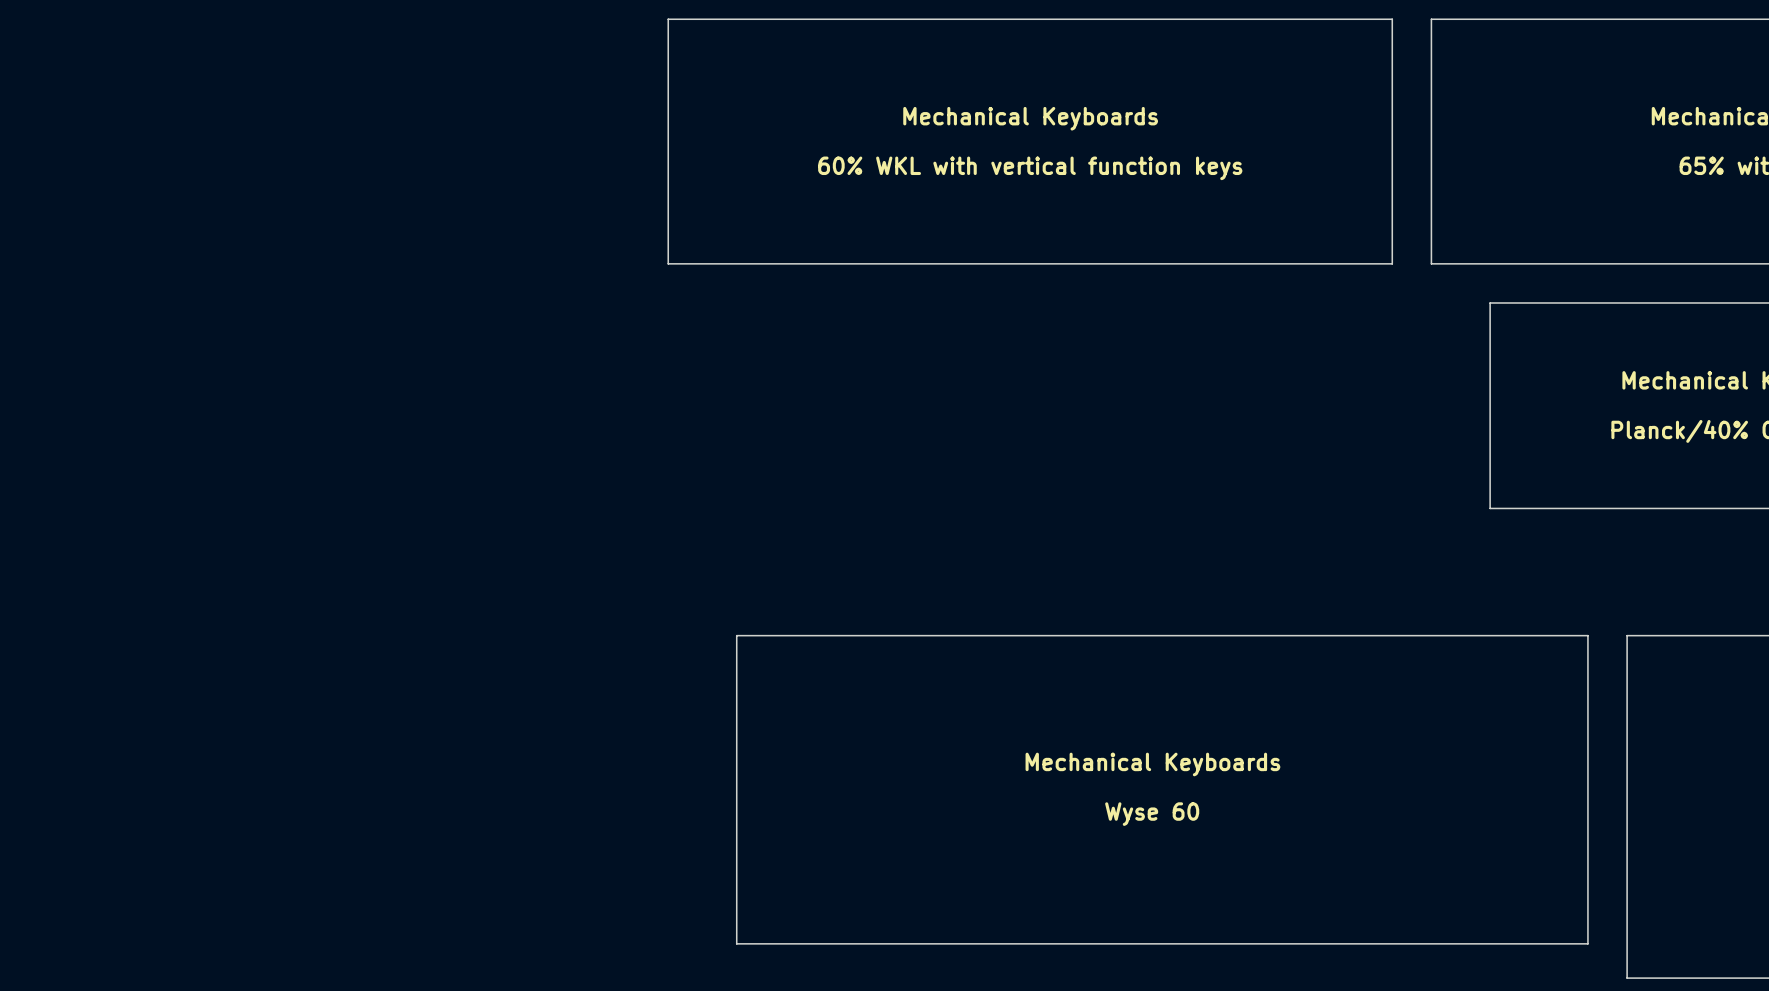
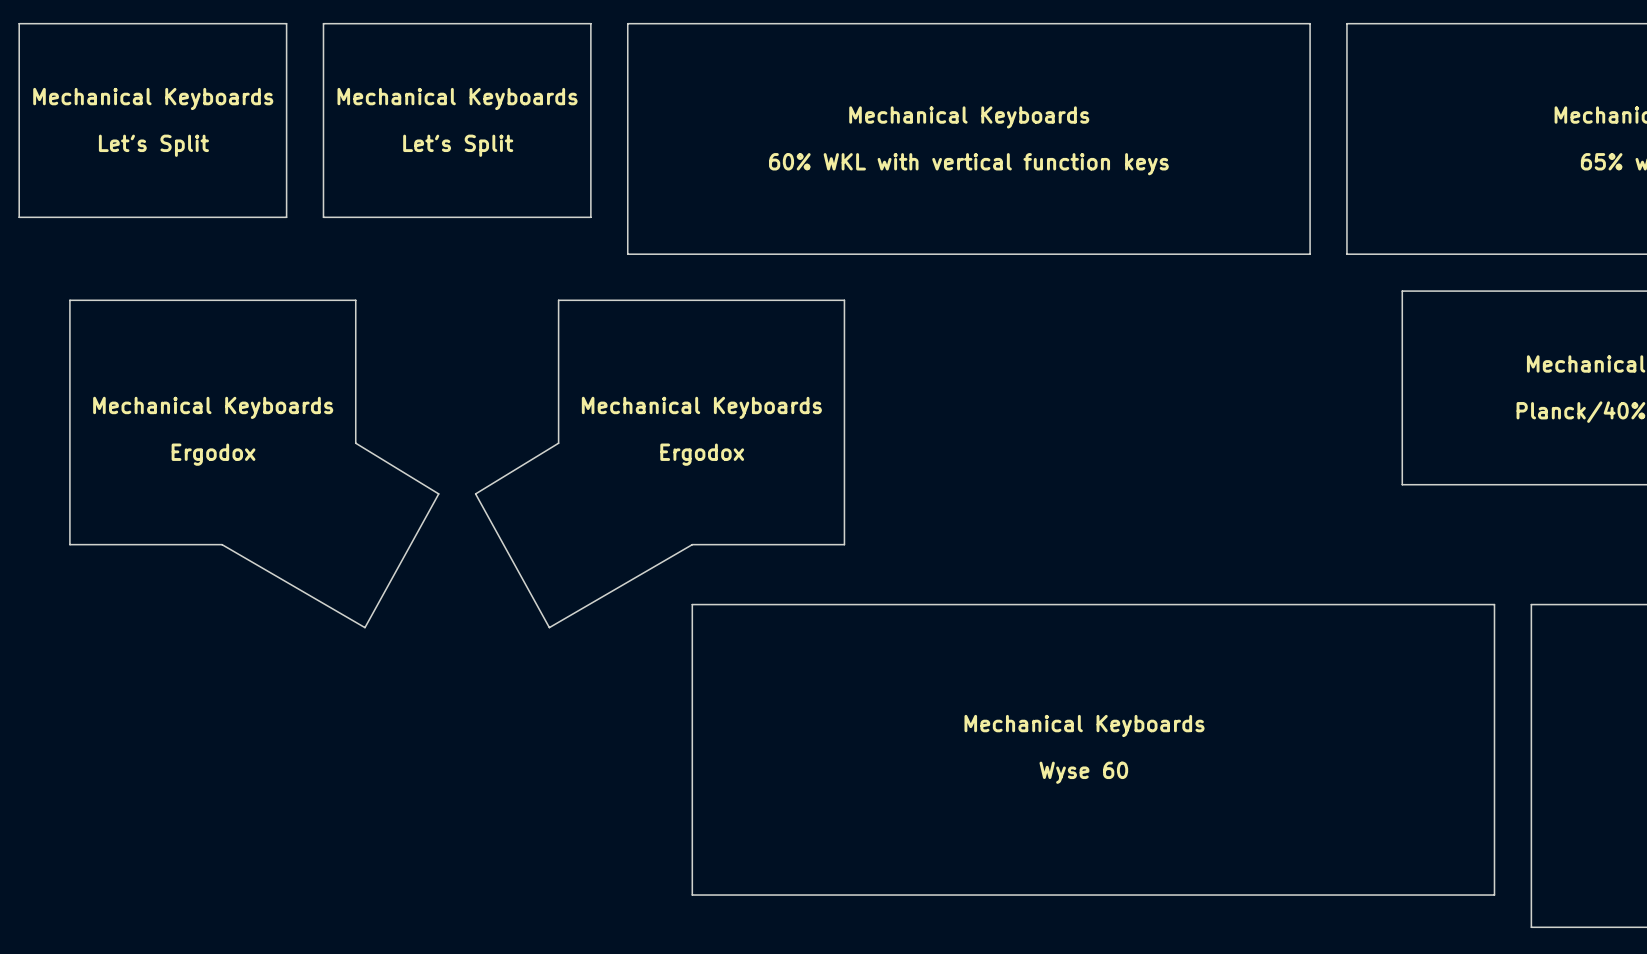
board edge: none -> (286, 23) (286, 217) (19, 217) (19, 23) (286, 23)
board edge: none -> (590, 23) (323, 23) (323, 217) (590, 217) (590, 23)
text: none -> Mechanical Keyboards (153, 99)
text: none -> Mechanical Keyboards (457, 99)
text: none -> Let's Split (153, 145)
text: none -> Let's Split (458, 145)
board edge: none -> (355, 300) (69, 300) (69, 544) (222, 544) (364, 627) (438, 493) (355, 443) (355, 300)
board edge: none -> (844, 300) (558, 300) (558, 443) (475, 493) (549, 627) (692, 544) (844, 544) (844, 300)
text: none -> Mechanical Keyboards (213, 407)
text: none -> Mechanical Keyboards (701, 407)
text: none -> Ergodox (213, 454)
text: none -> Ergodox (702, 454)

